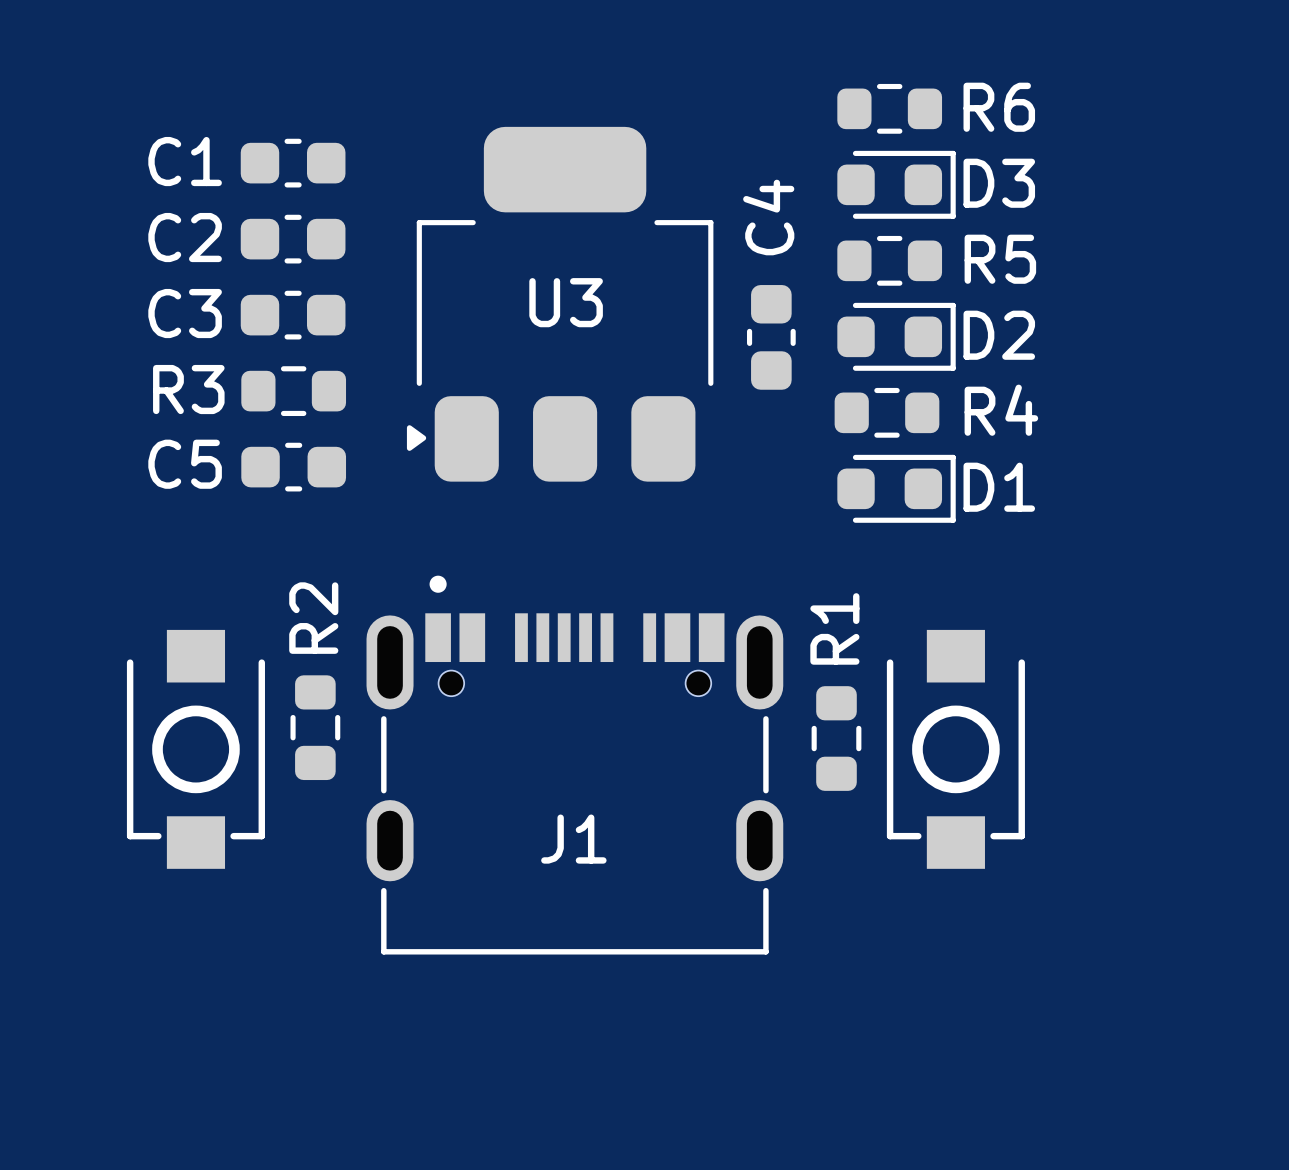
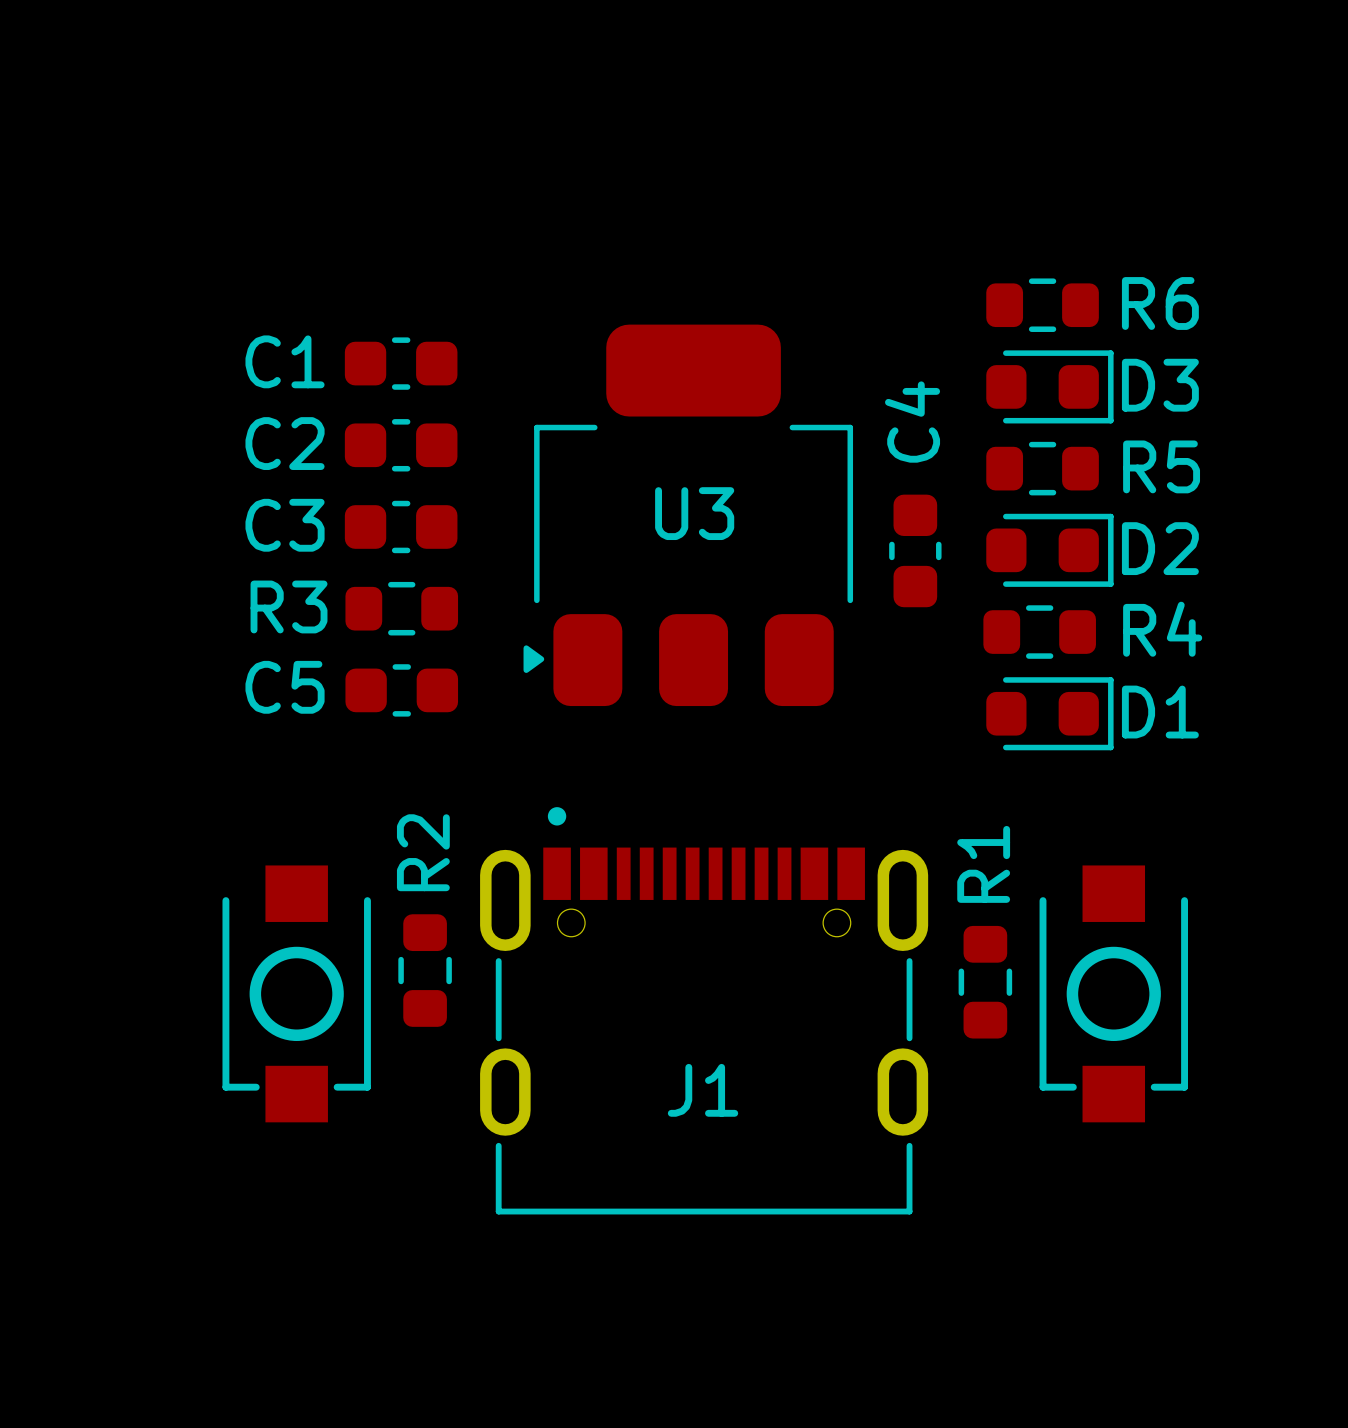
J1 footprint: [366, 575, 784, 955] -> [480, 807, 929, 1215]

